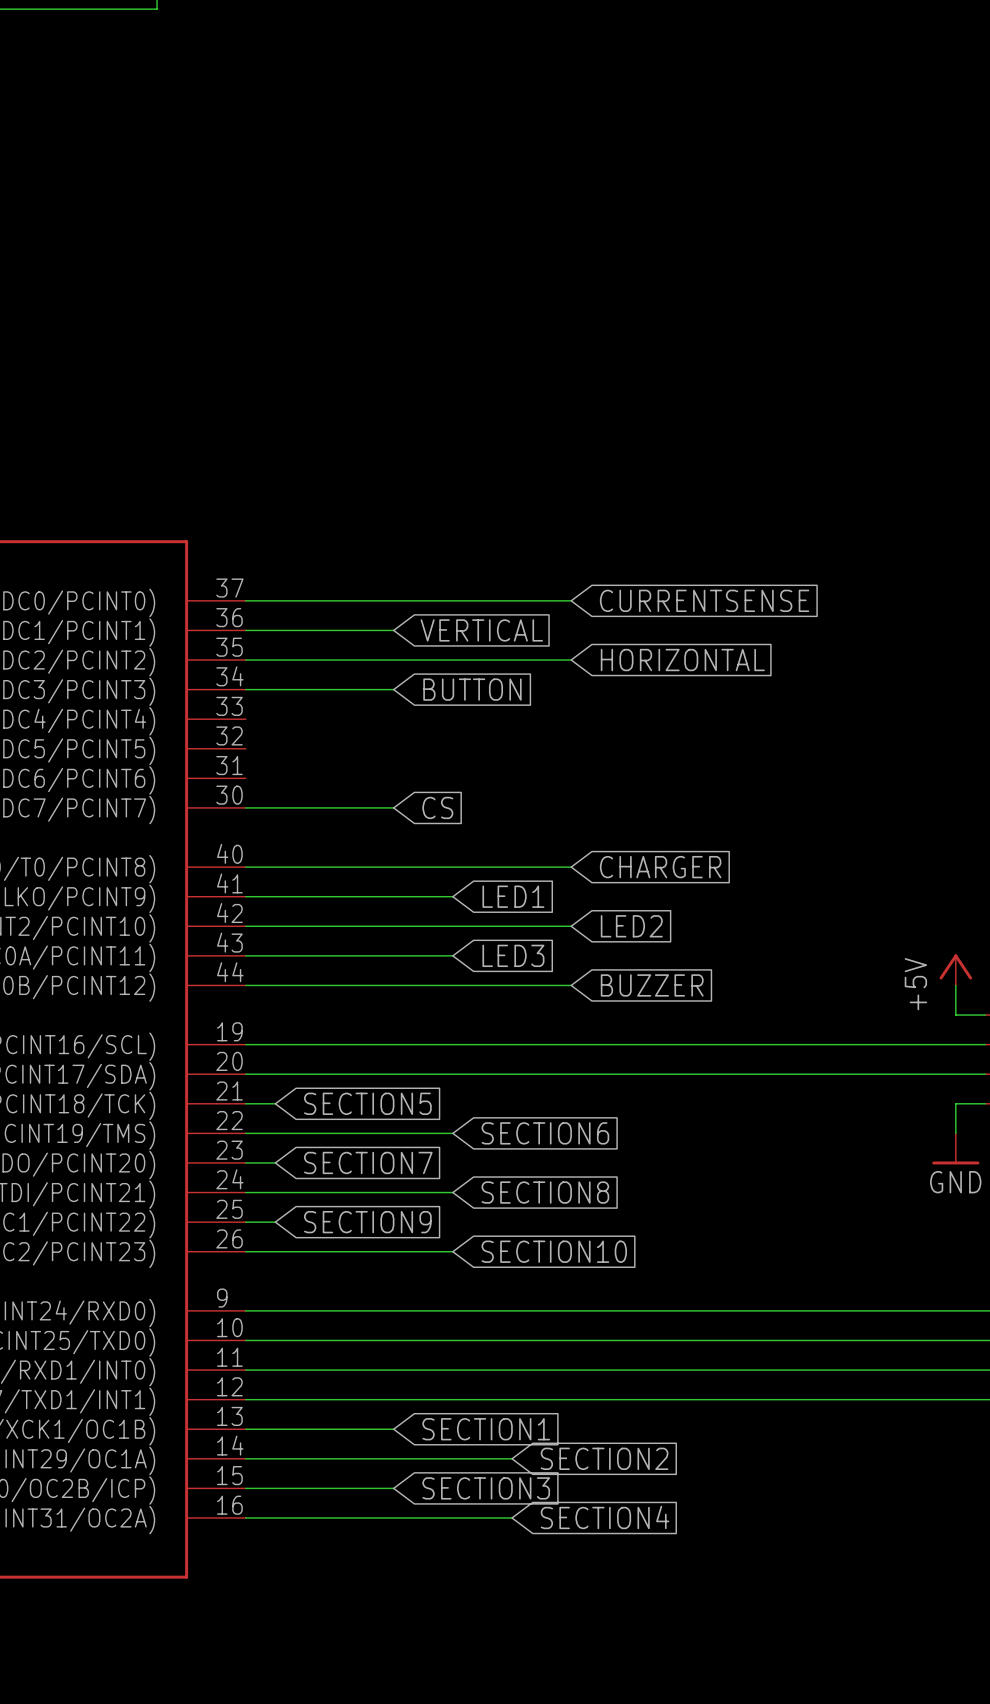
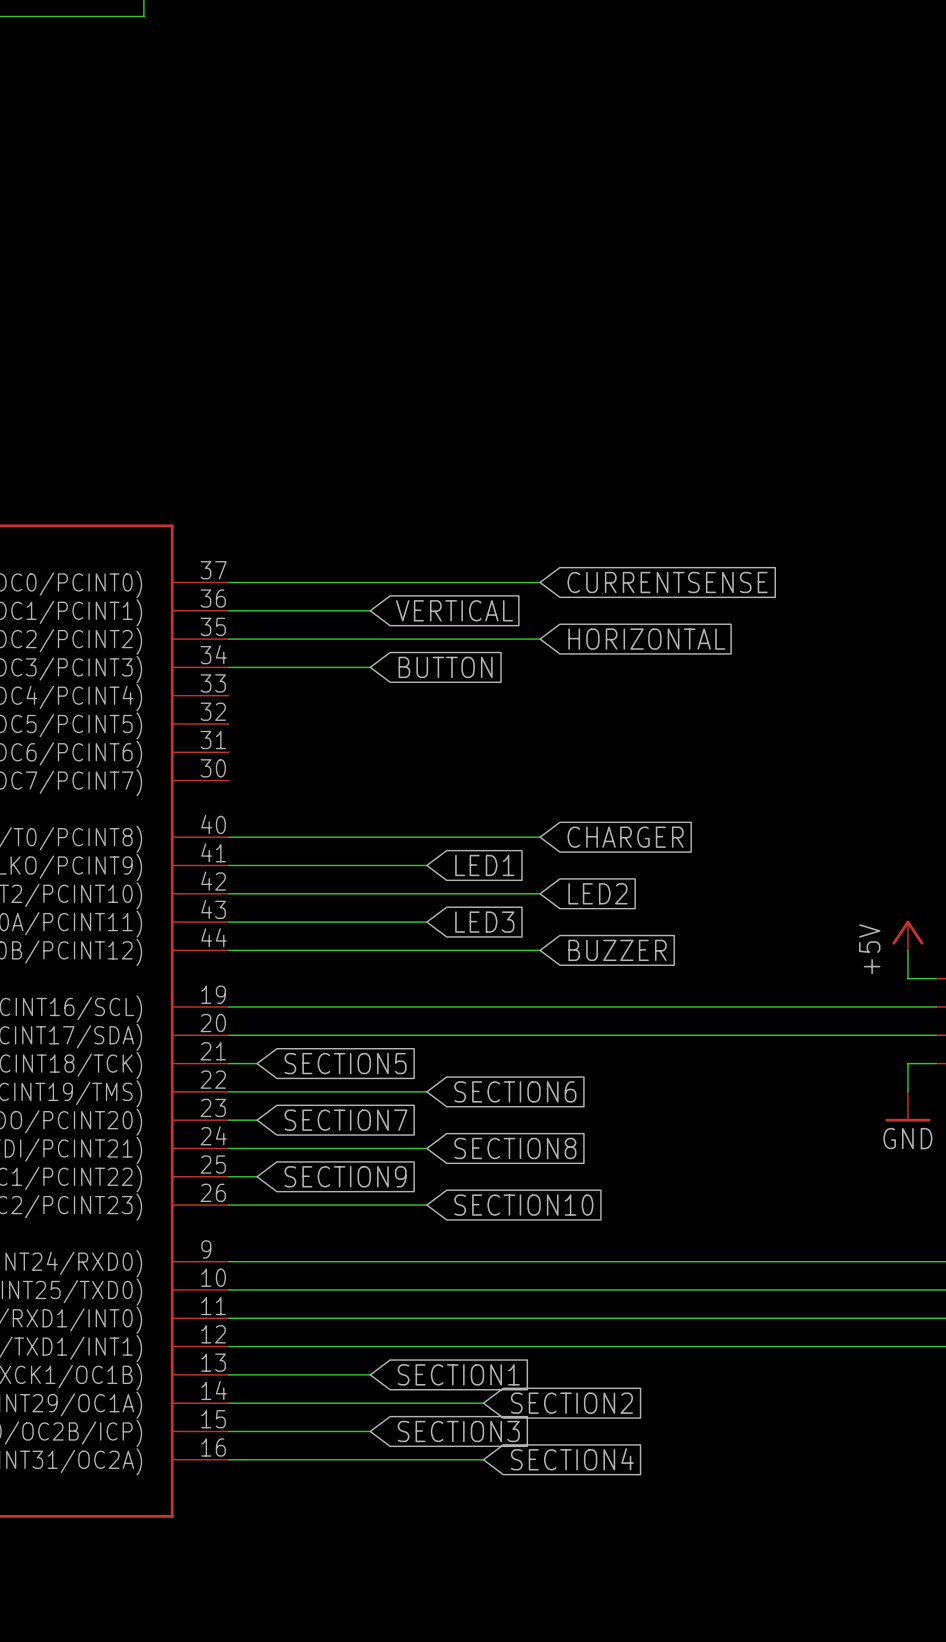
wire: (245, 807) (393, 807) -> none
global label: CS (437, 807) -> none

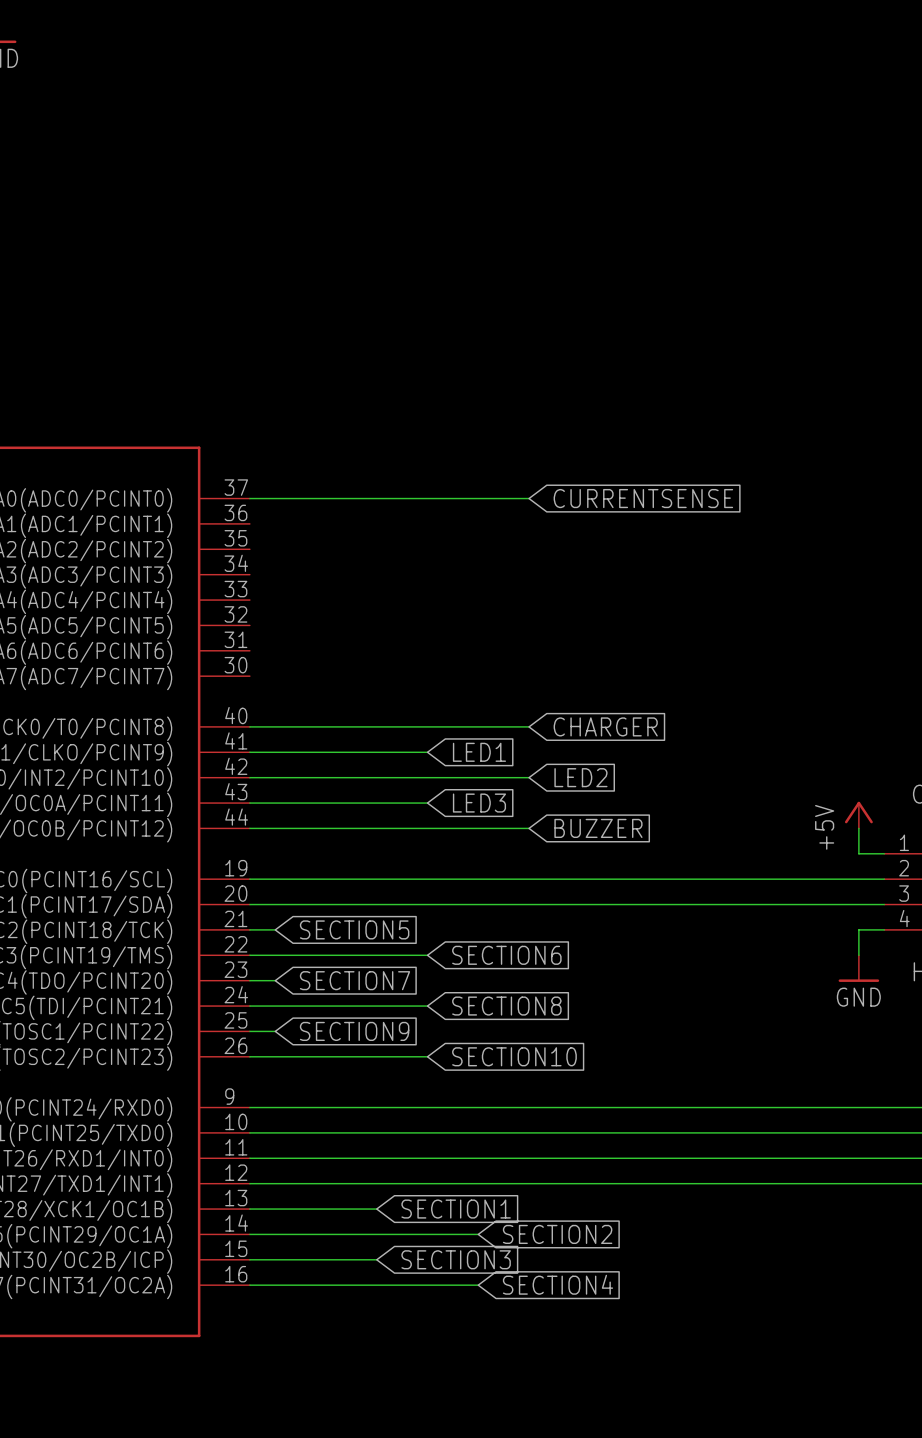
wire: (228, 610) (370, 610) -> none
global label: VERTICAL (454, 610) -> none
wire: (228, 639) (540, 639) -> none
global label: HORIZONTAL (646, 639) -> none
wire: (228, 667) (370, 667) -> none
global label: BUTTON (445, 667) -> none

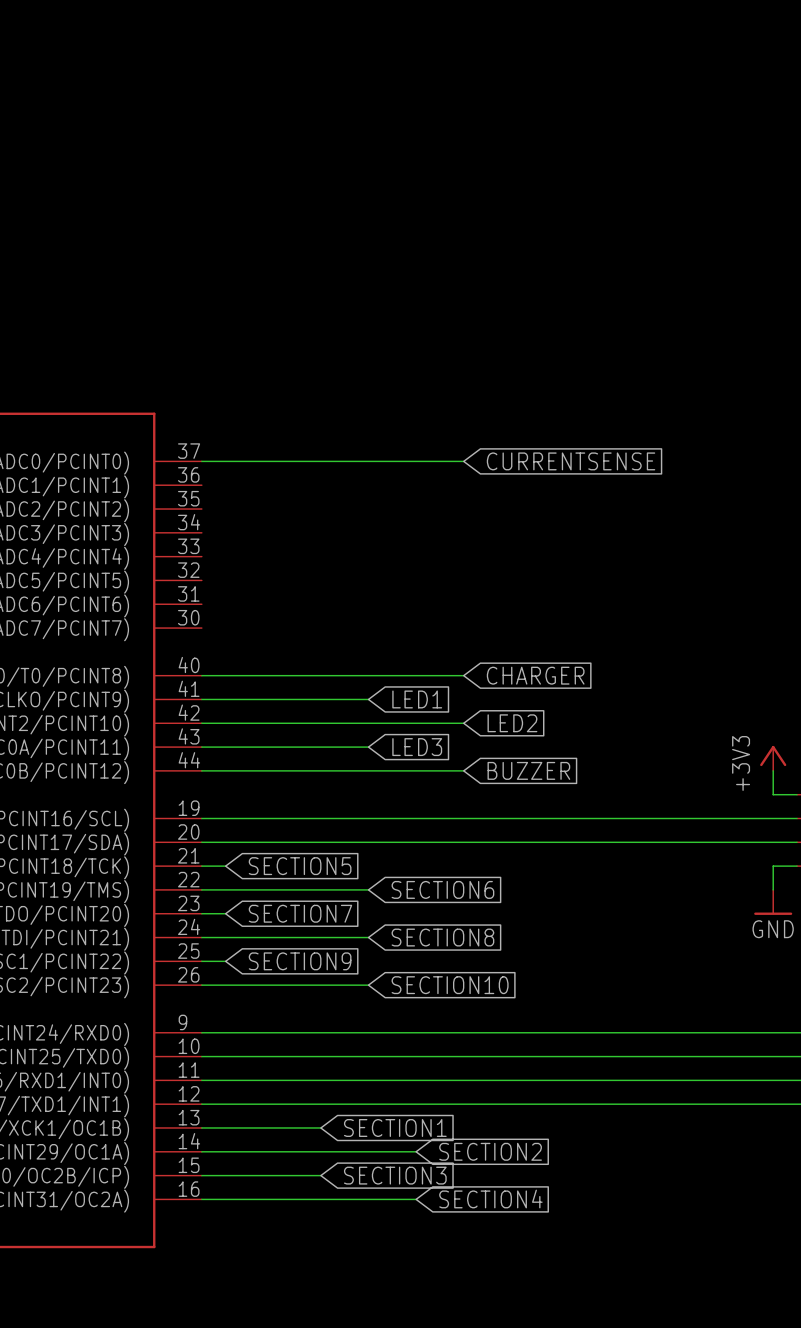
power symbol: +5V (858, 815) -> +3V3 (773, 758)

